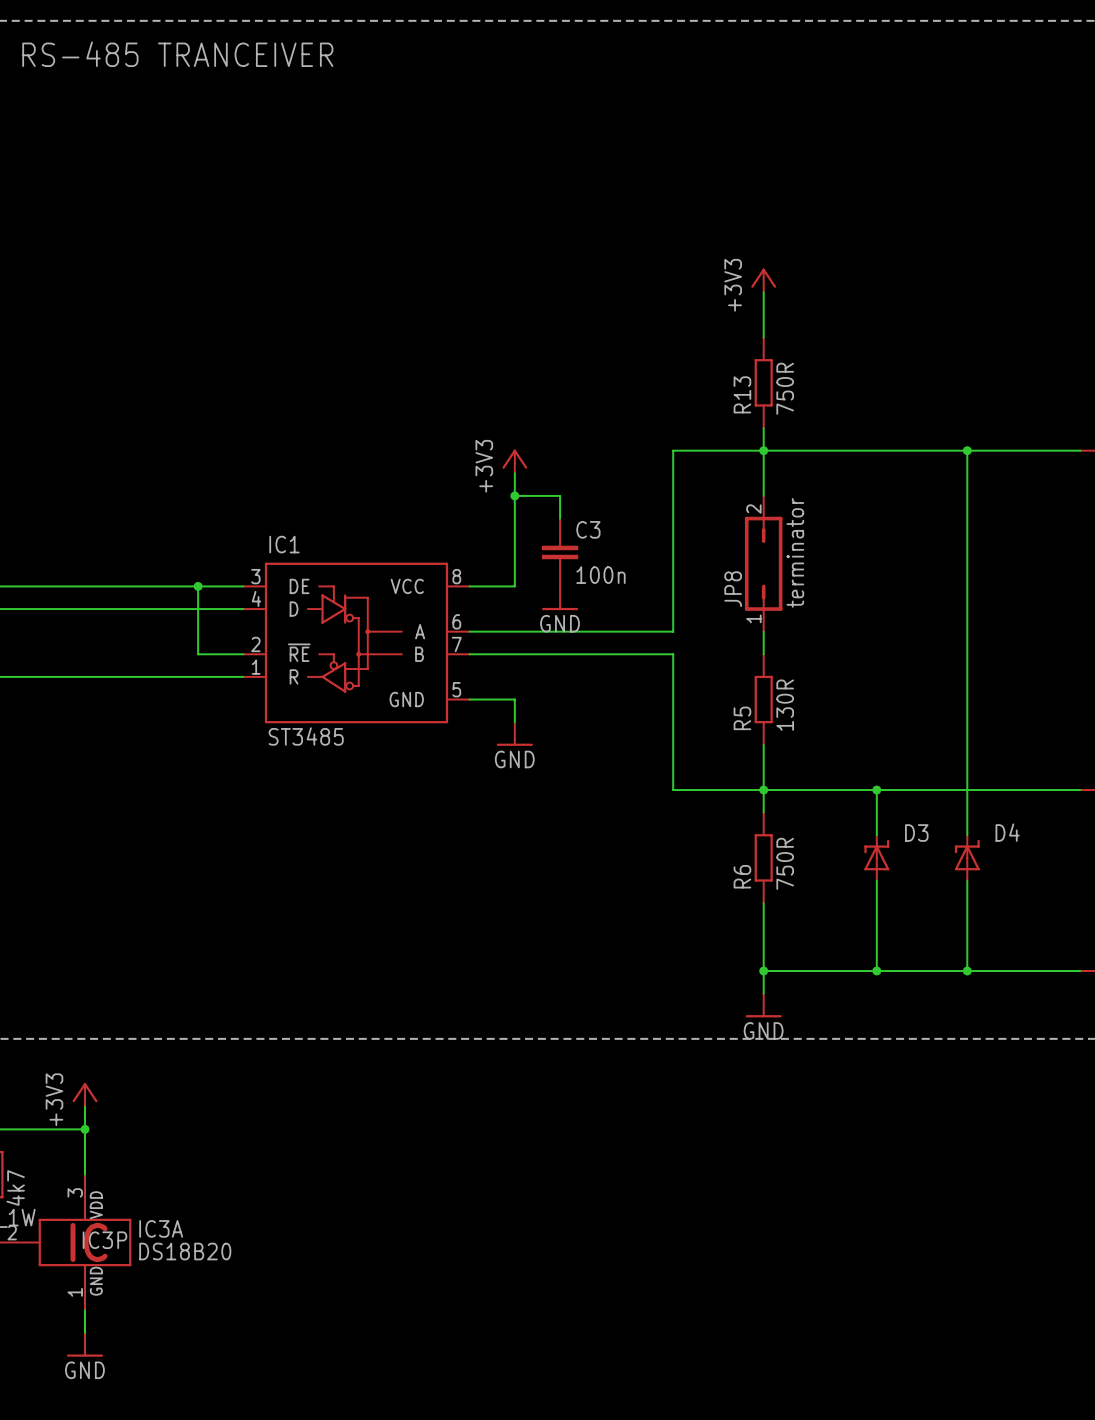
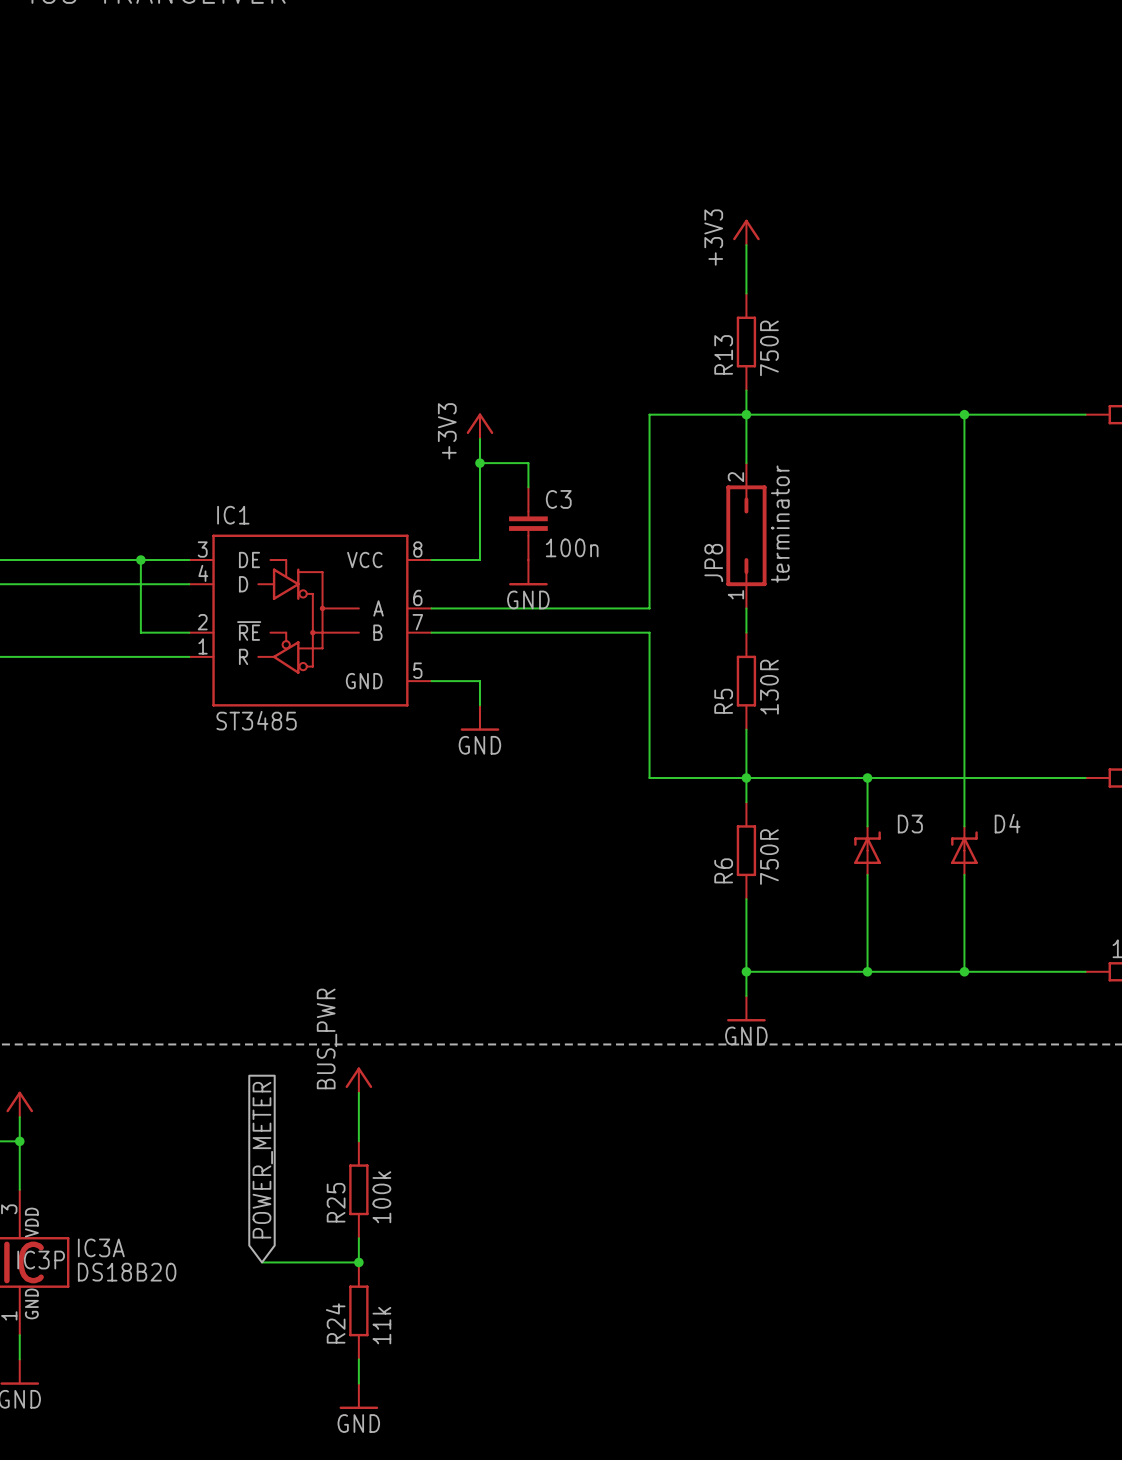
power symbol: none -> BUS_PWR (358, 1080)
wire: none -> (358, 1092) (358, 1141)
global label: none -> POWER_METER (262, 1160)
R25: none -> 100k (358, 1189)
wire: none -> (358, 1238) (358, 1262) (261, 1262)
junction: none -> (358, 1262)
R24: none -> 11k (358, 1310)
wire: none -> (358, 1359) (358, 1383)
power symbol: none -> GND (358, 1396)

